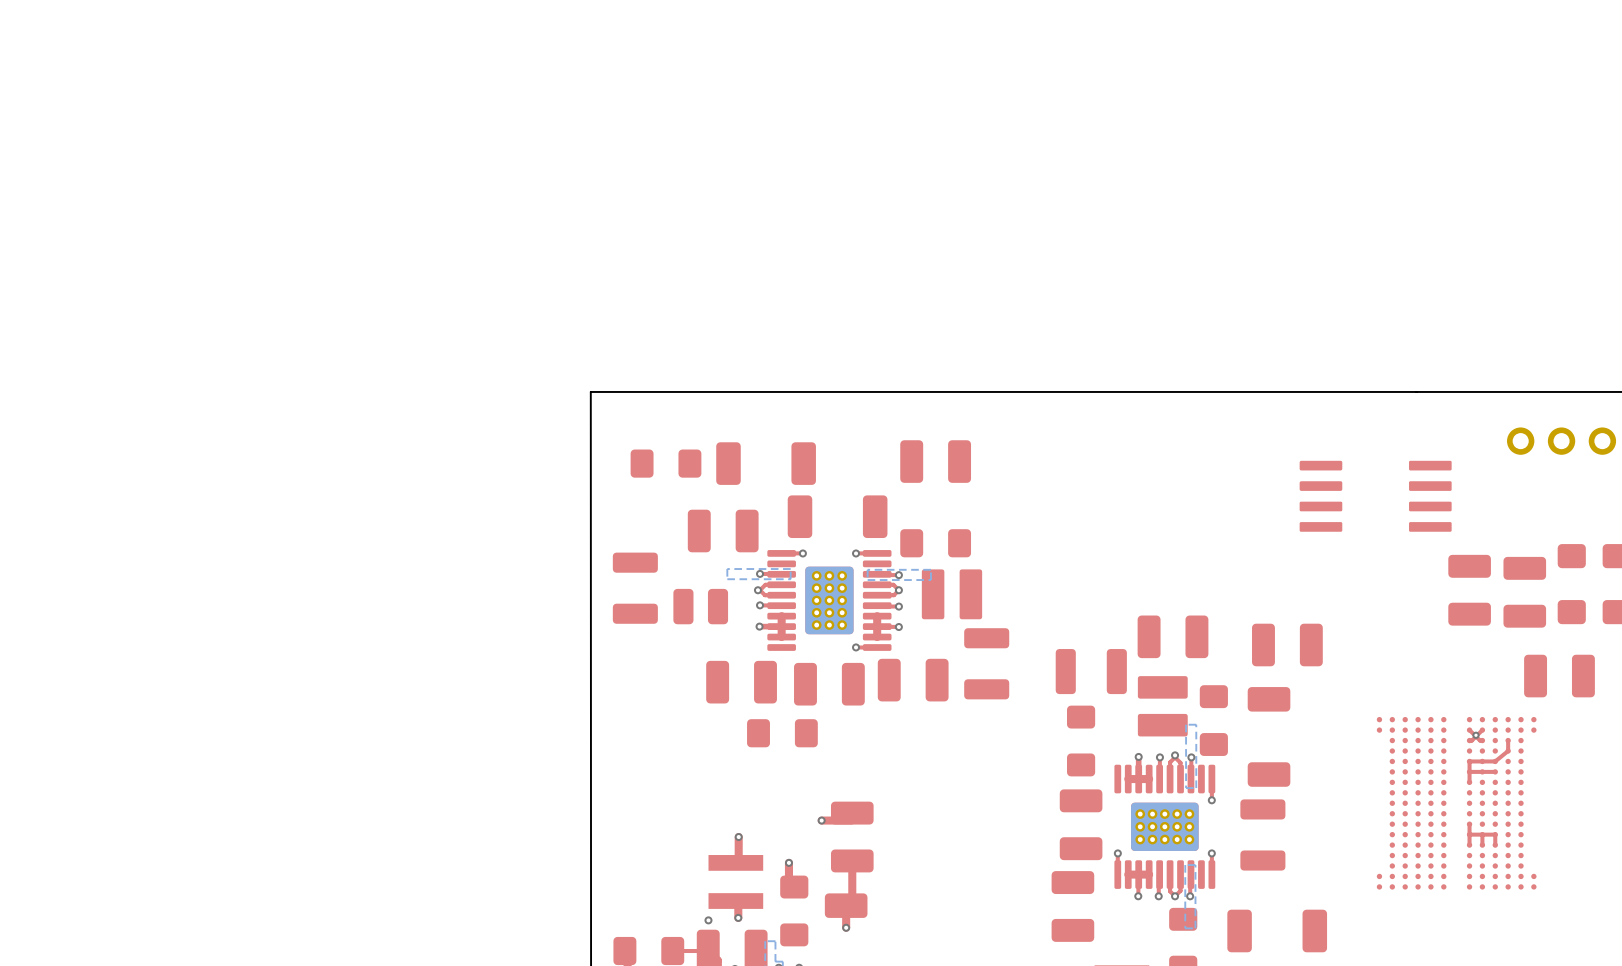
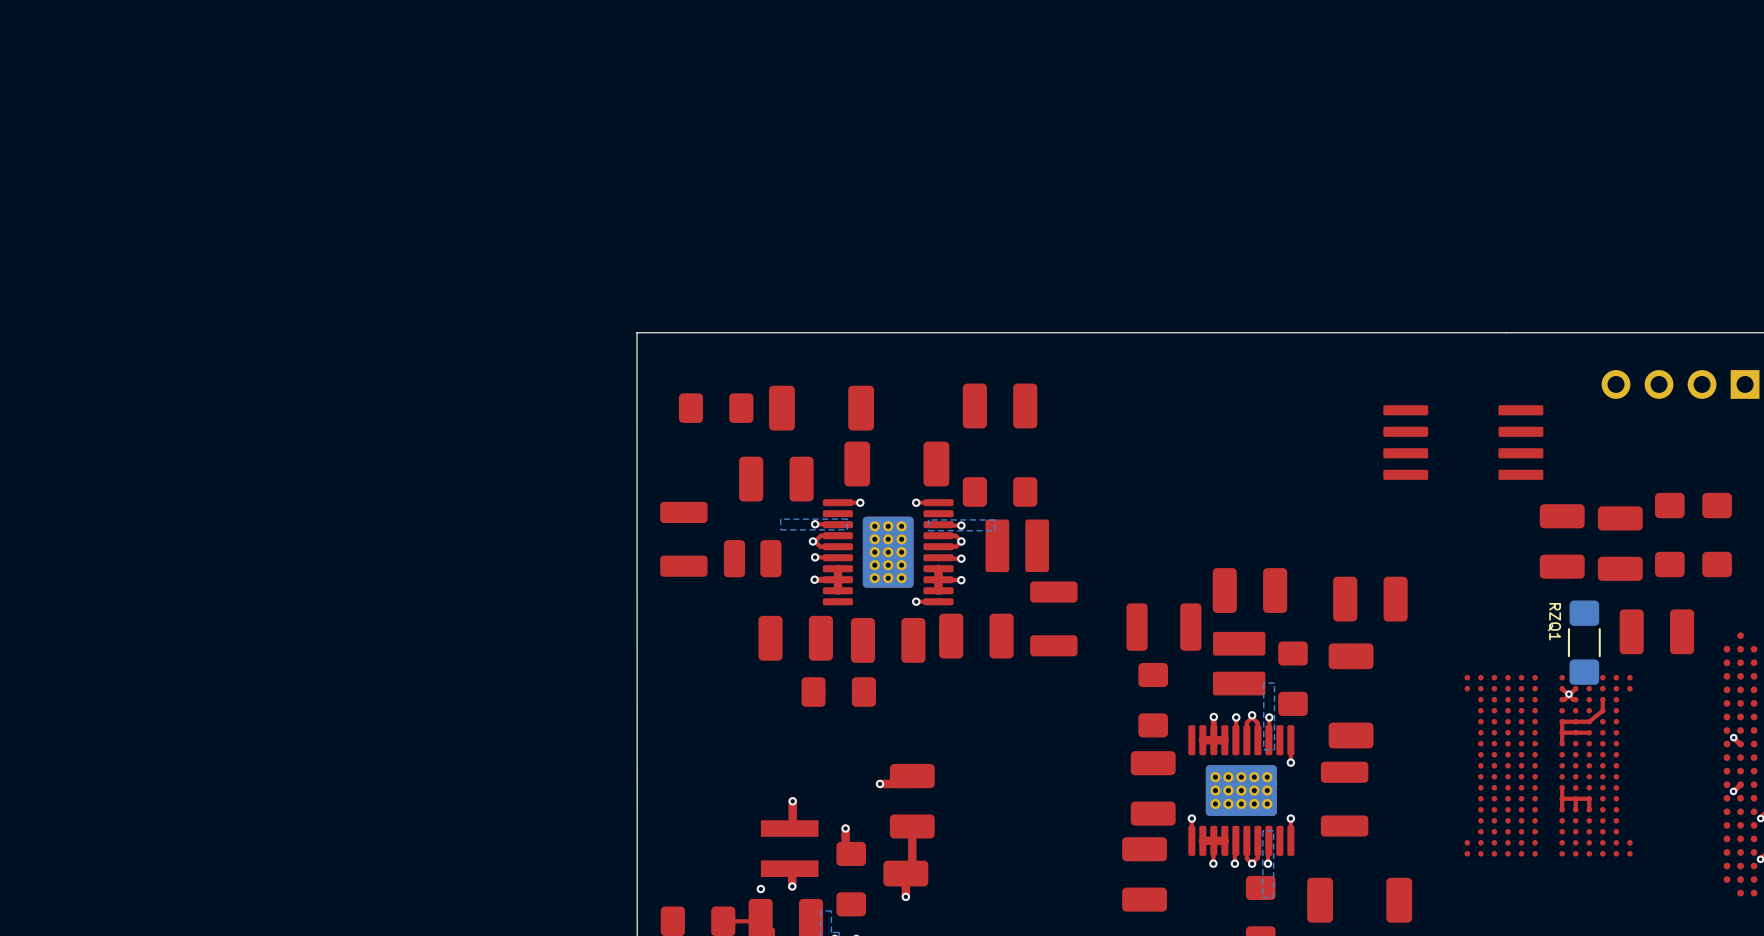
RZQ1: none -> (1584, 642)

